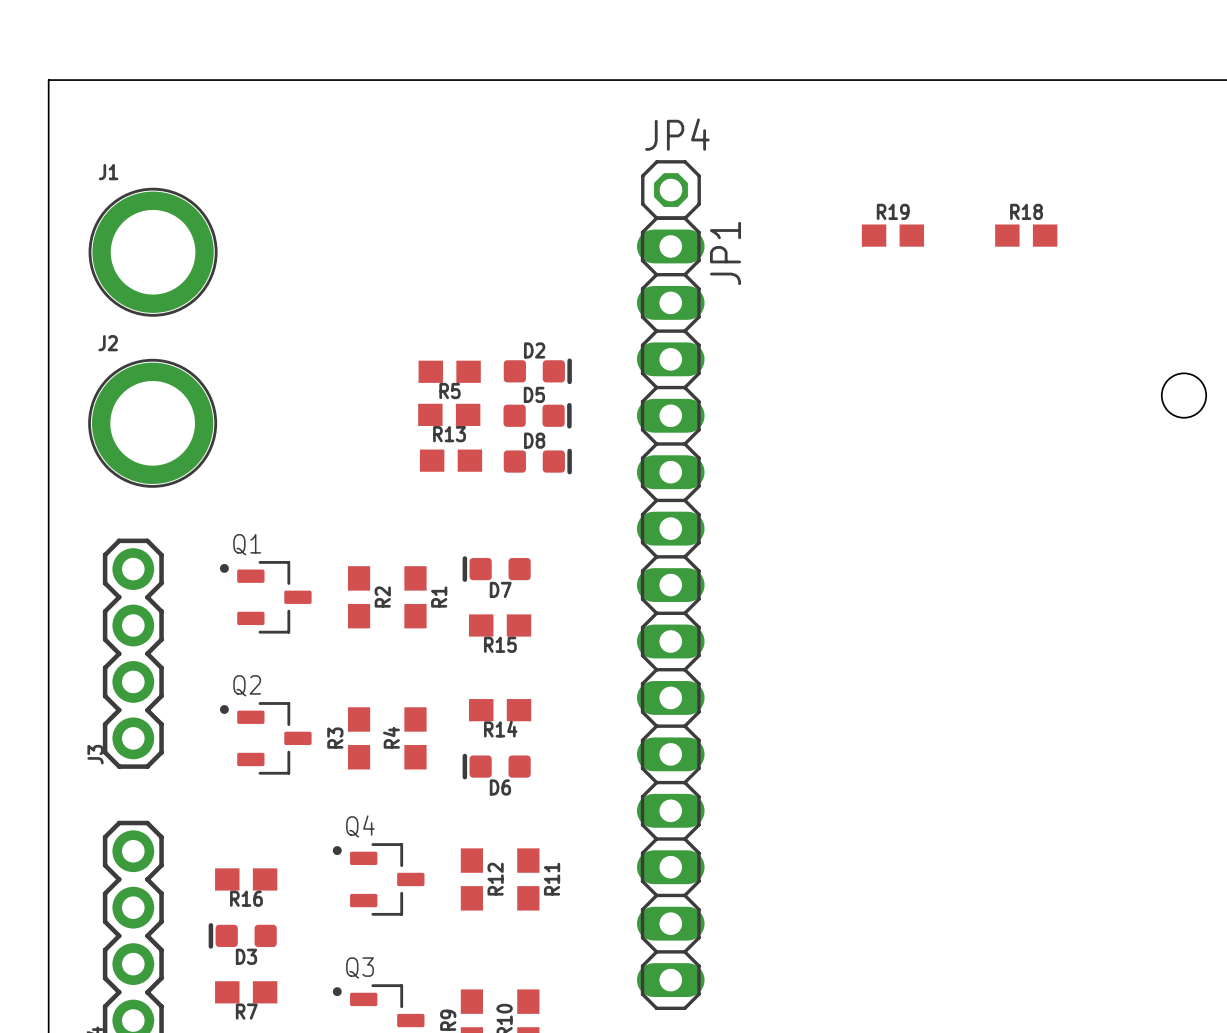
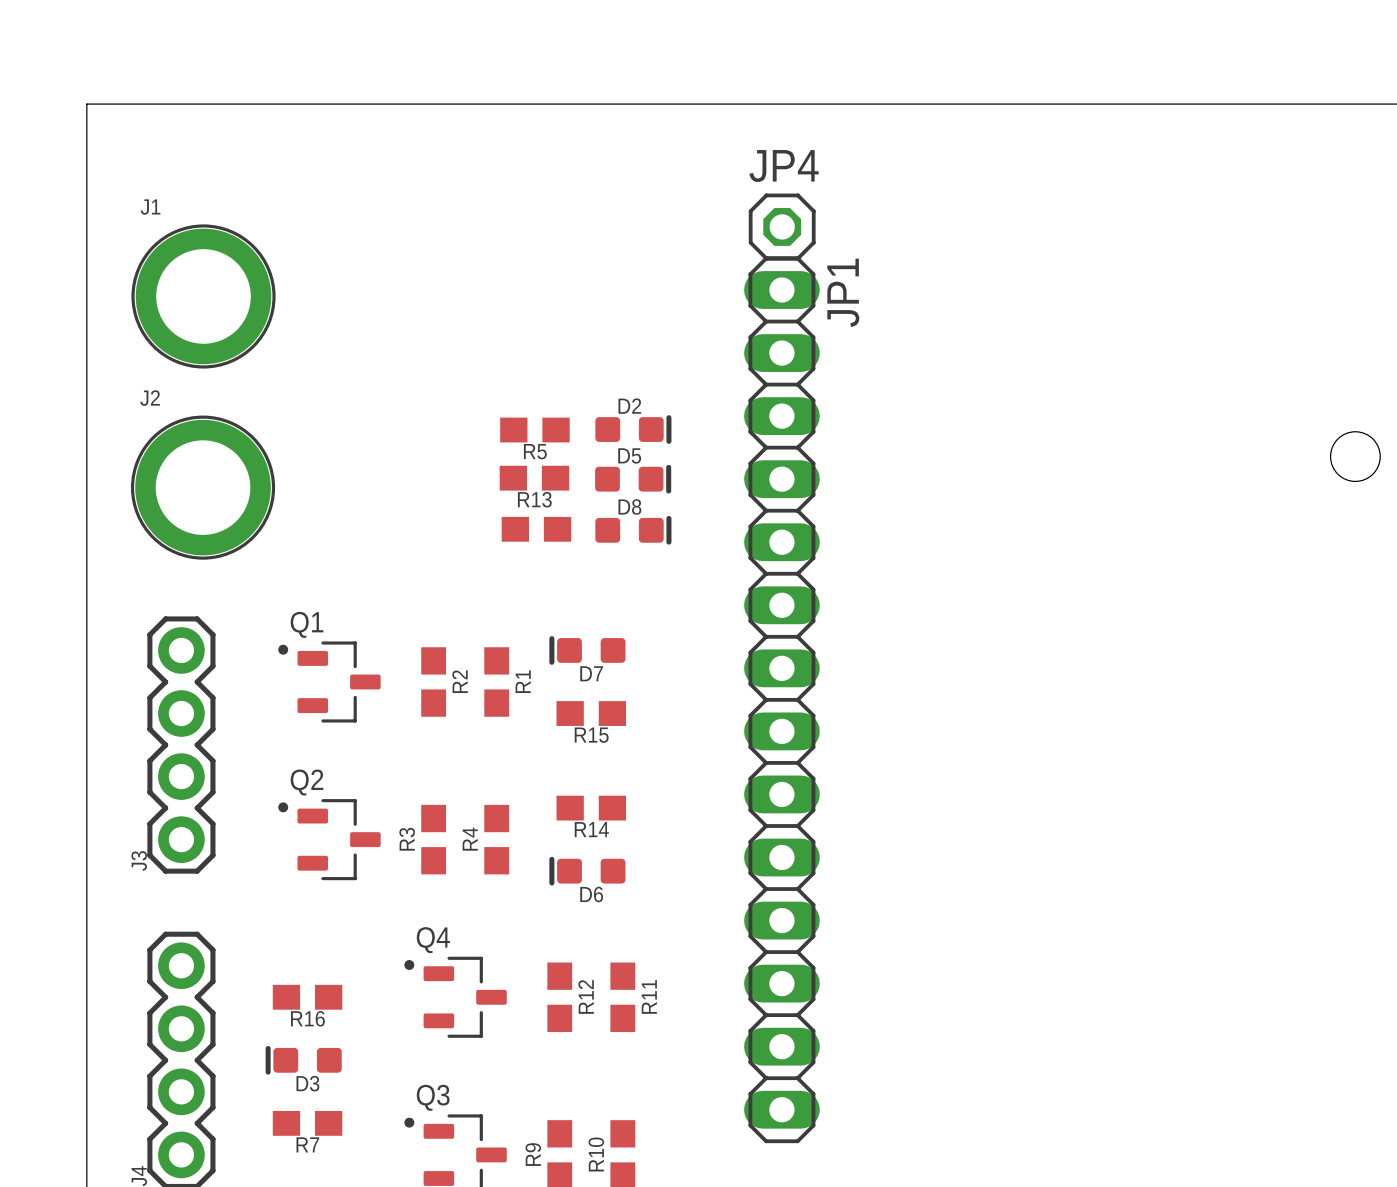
R19: (892, 235) -> none
R18: (1026, 235) -> none

